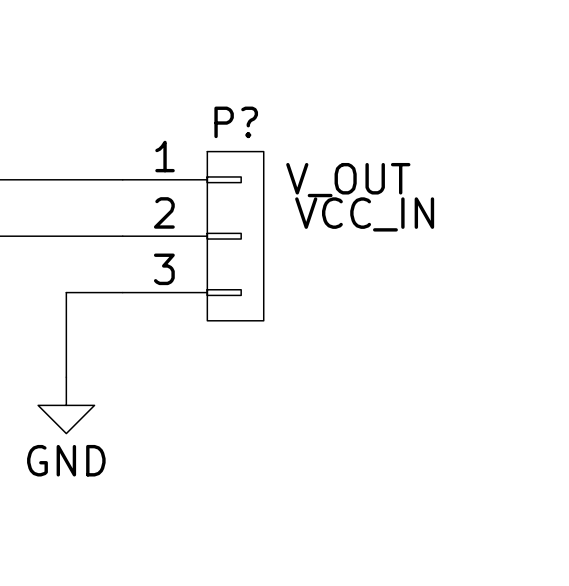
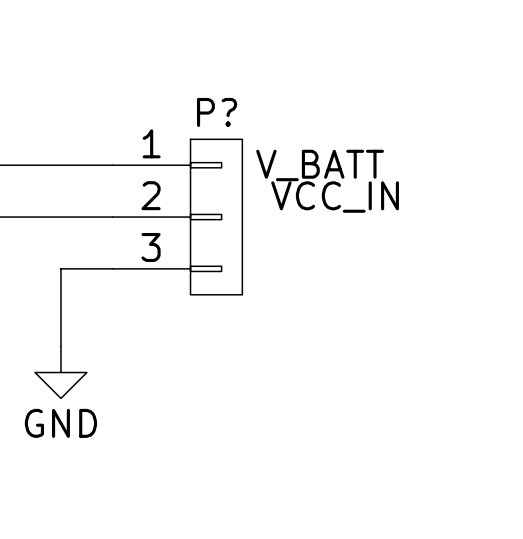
P? value: V_OUT (348, 180) -> V_BATT (320, 165)

